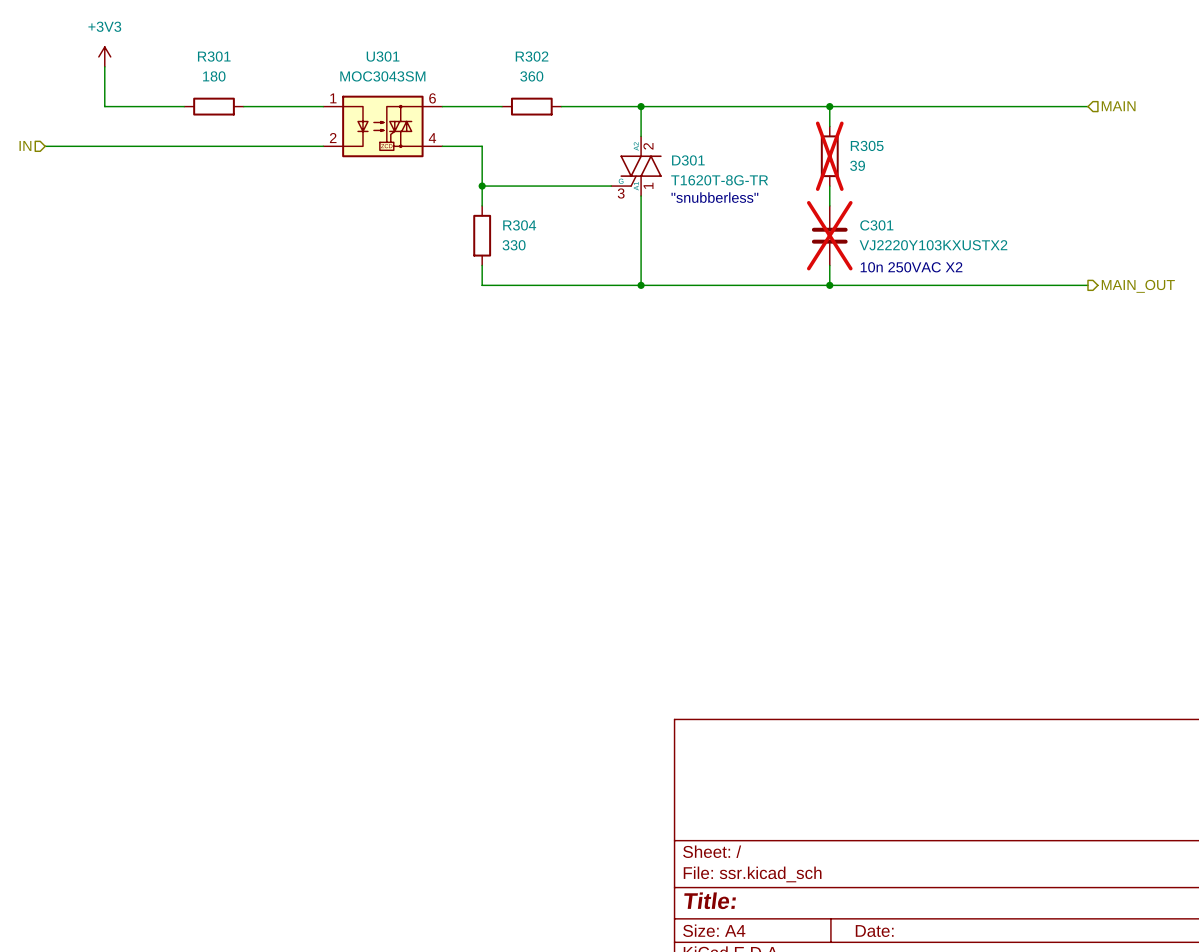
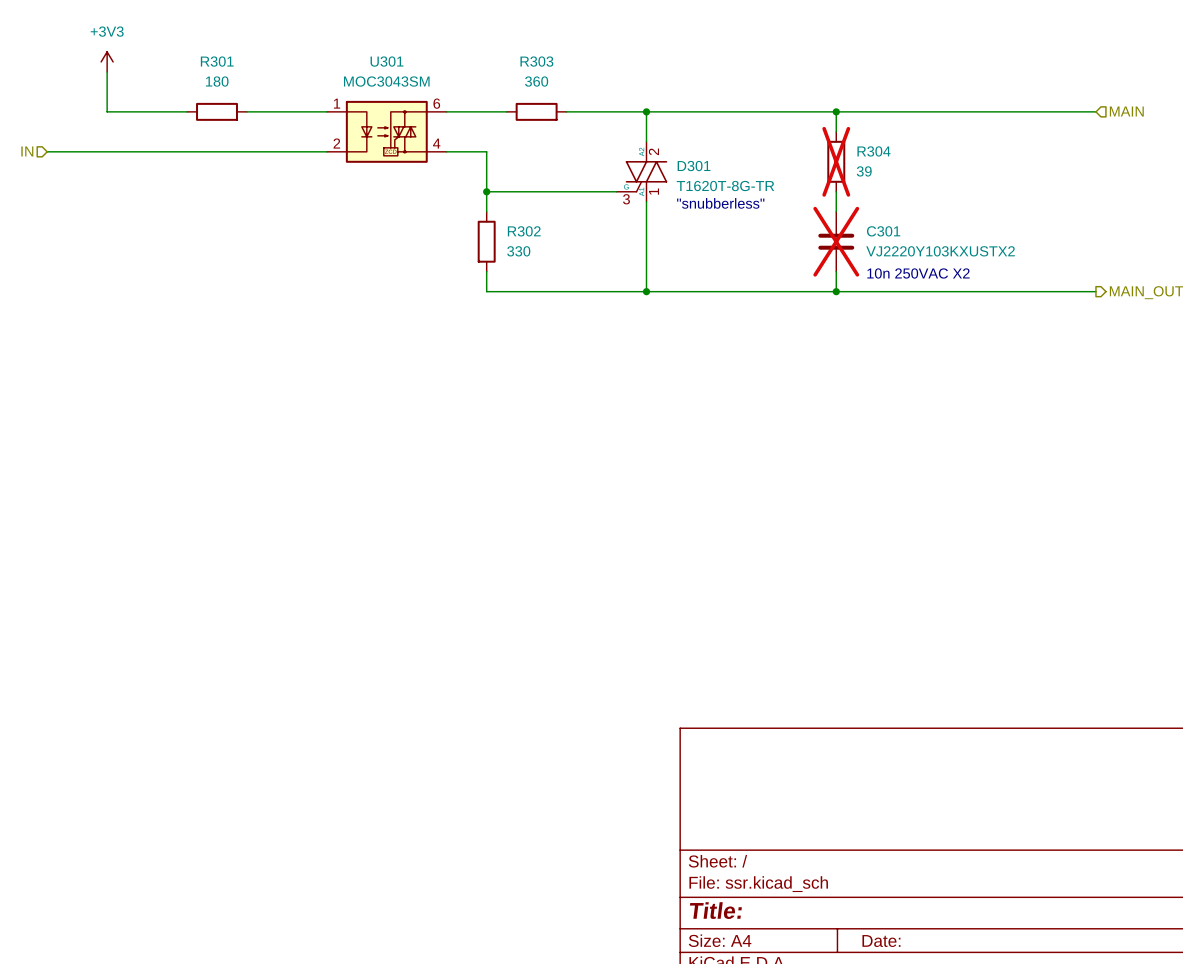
R302 name: R302 (532, 56) -> R303 (536, 61)
R305 name: R305 (867, 145) -> R304 (873, 151)
R304 name: R304 (519, 225) -> R302 (524, 231)

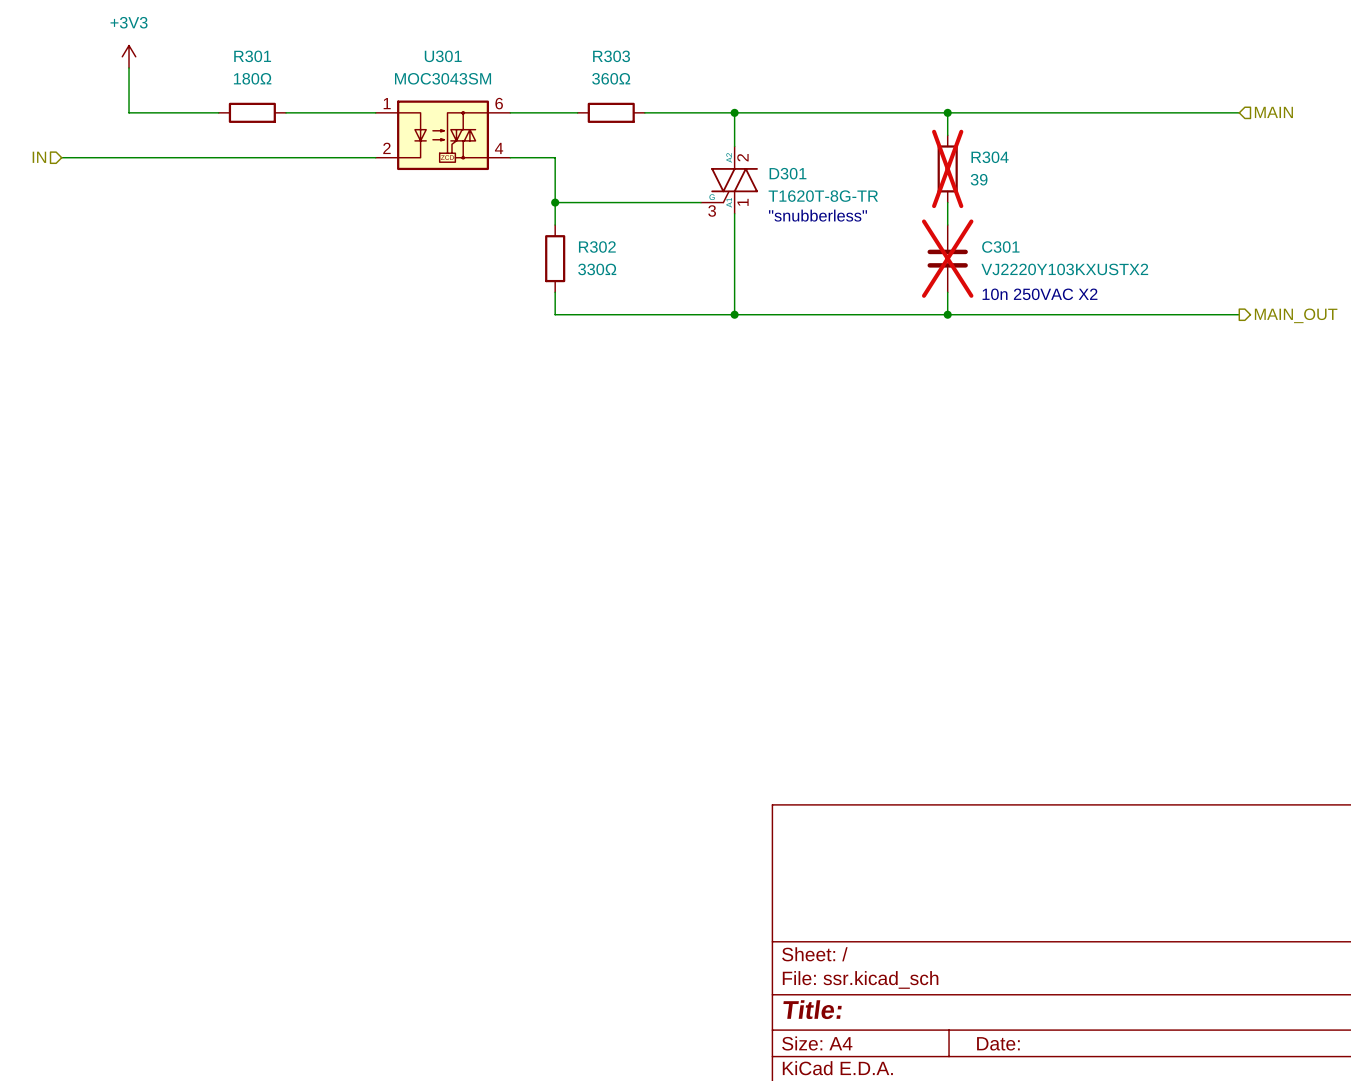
R301 value: 180 (217, 81) -> 180Ω (252, 78)
R303 value: 360 (536, 81) -> 360Ω (611, 78)
R302 value: 330 (518, 251) -> 330Ω (597, 269)

